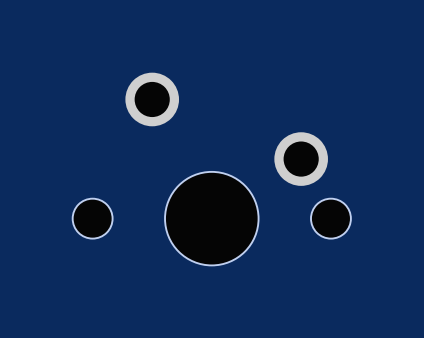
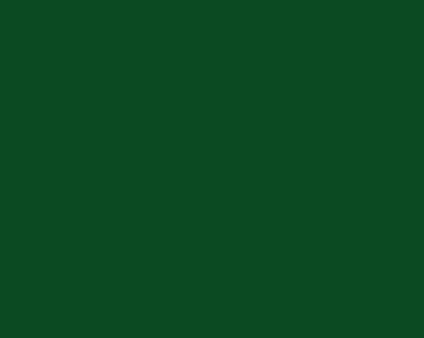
part: (211, 169) -> none

